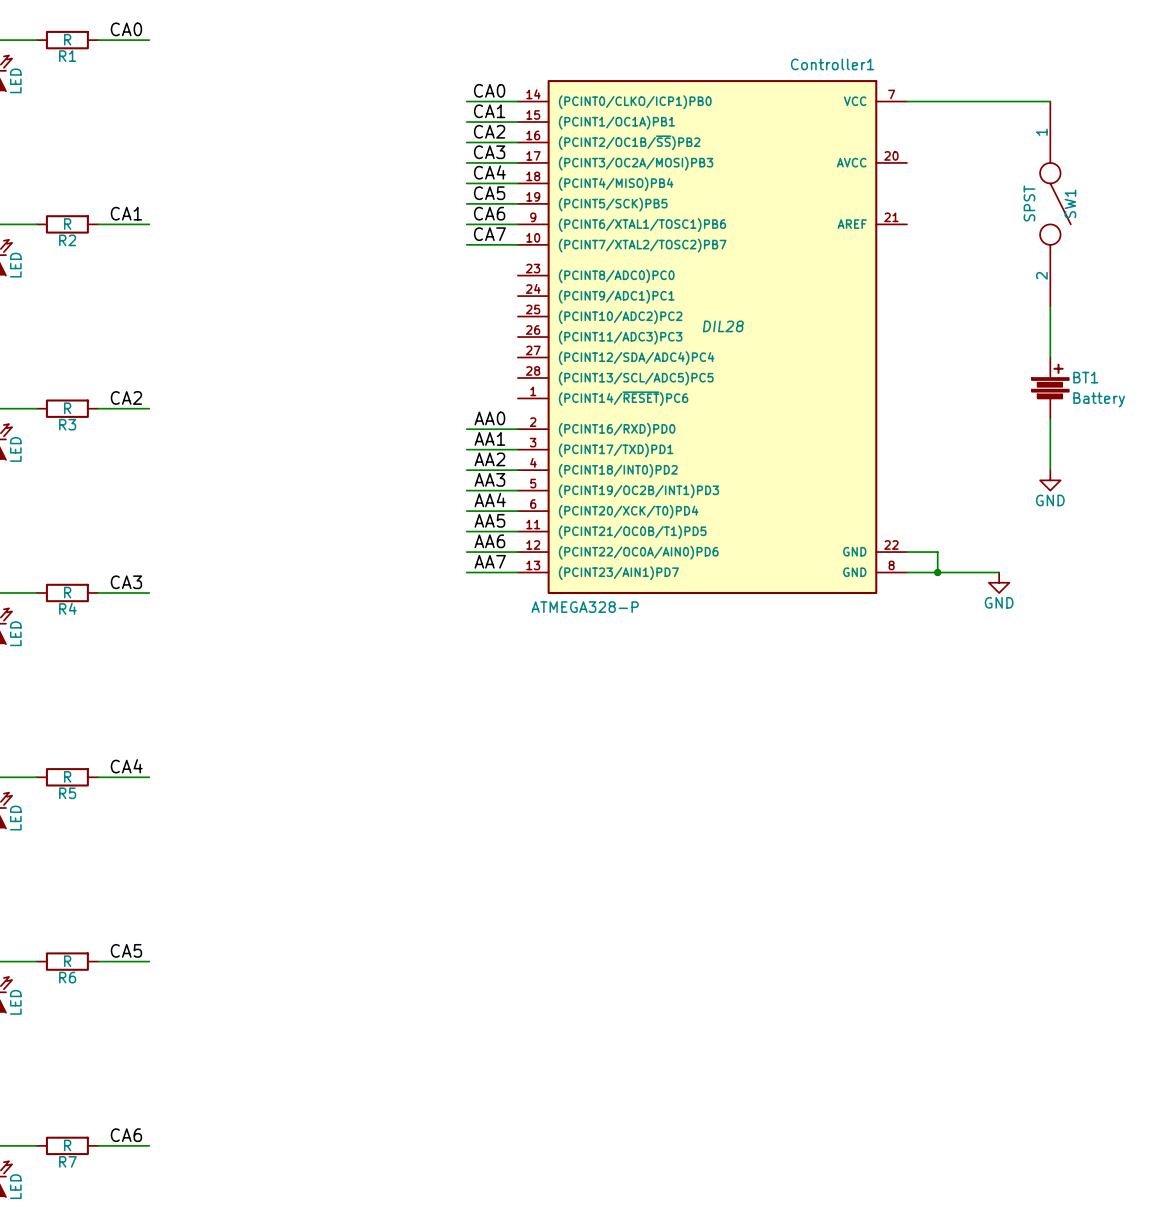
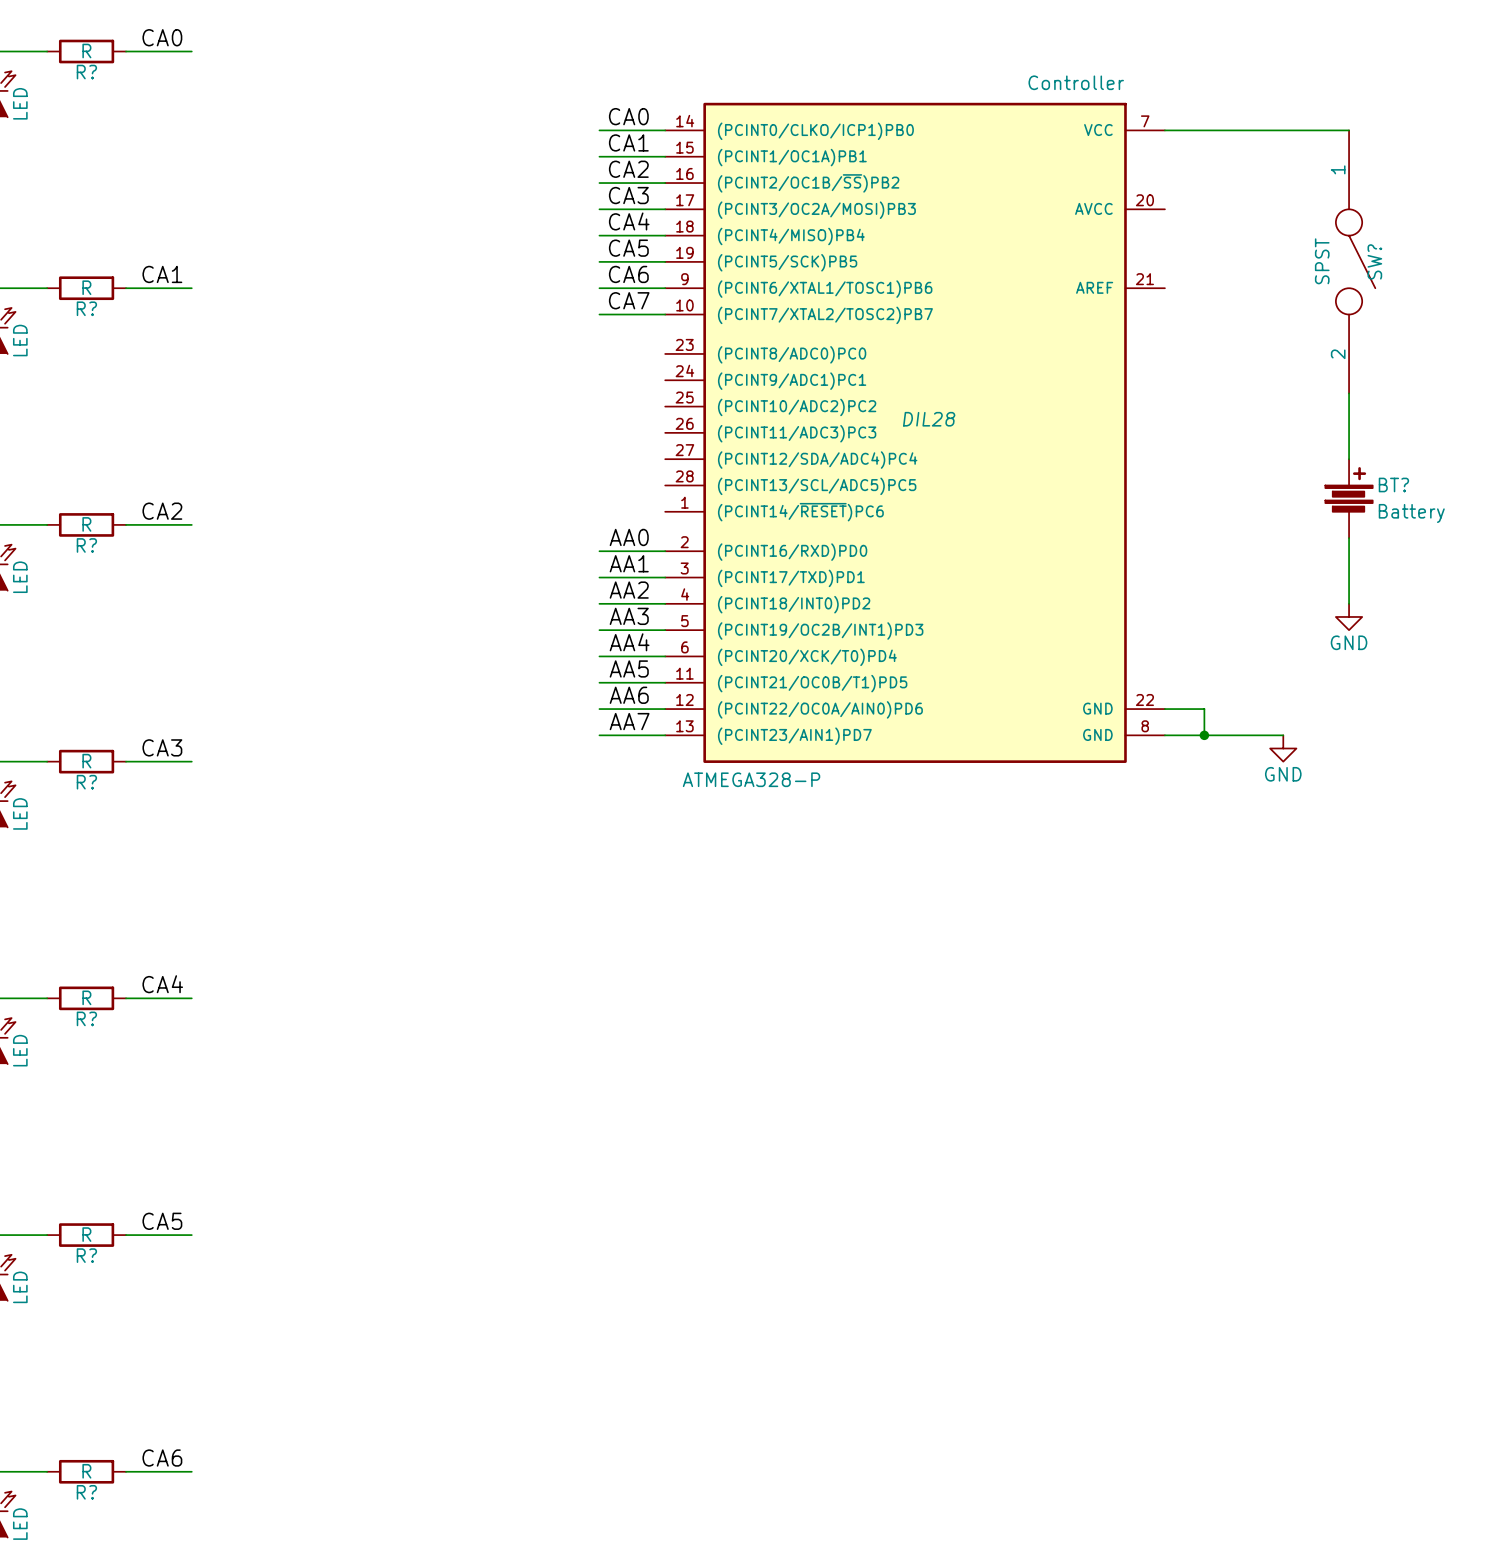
R1 name: R1 (67, 56) -> R? (86, 72)
Controller1 name: Controller1 (832, 64) -> Controller (1076, 82)
SW1 name: SW1 (1070, 203) -> SW? (1374, 261)
R2 name: R2 (67, 240) -> R? (86, 308)
BT1 name: BT1 (1085, 377) -> BT? (1393, 484)
R3 name: R3 (67, 424) -> R? (86, 545)
R4 name: R4 (67, 608) -> R? (86, 782)
R5 name: R5 (67, 793) -> R? (86, 1018)
R6 name: R6 (67, 977) -> R? (86, 1255)
R7 name: R7 (67, 1161) -> R? (86, 1492)

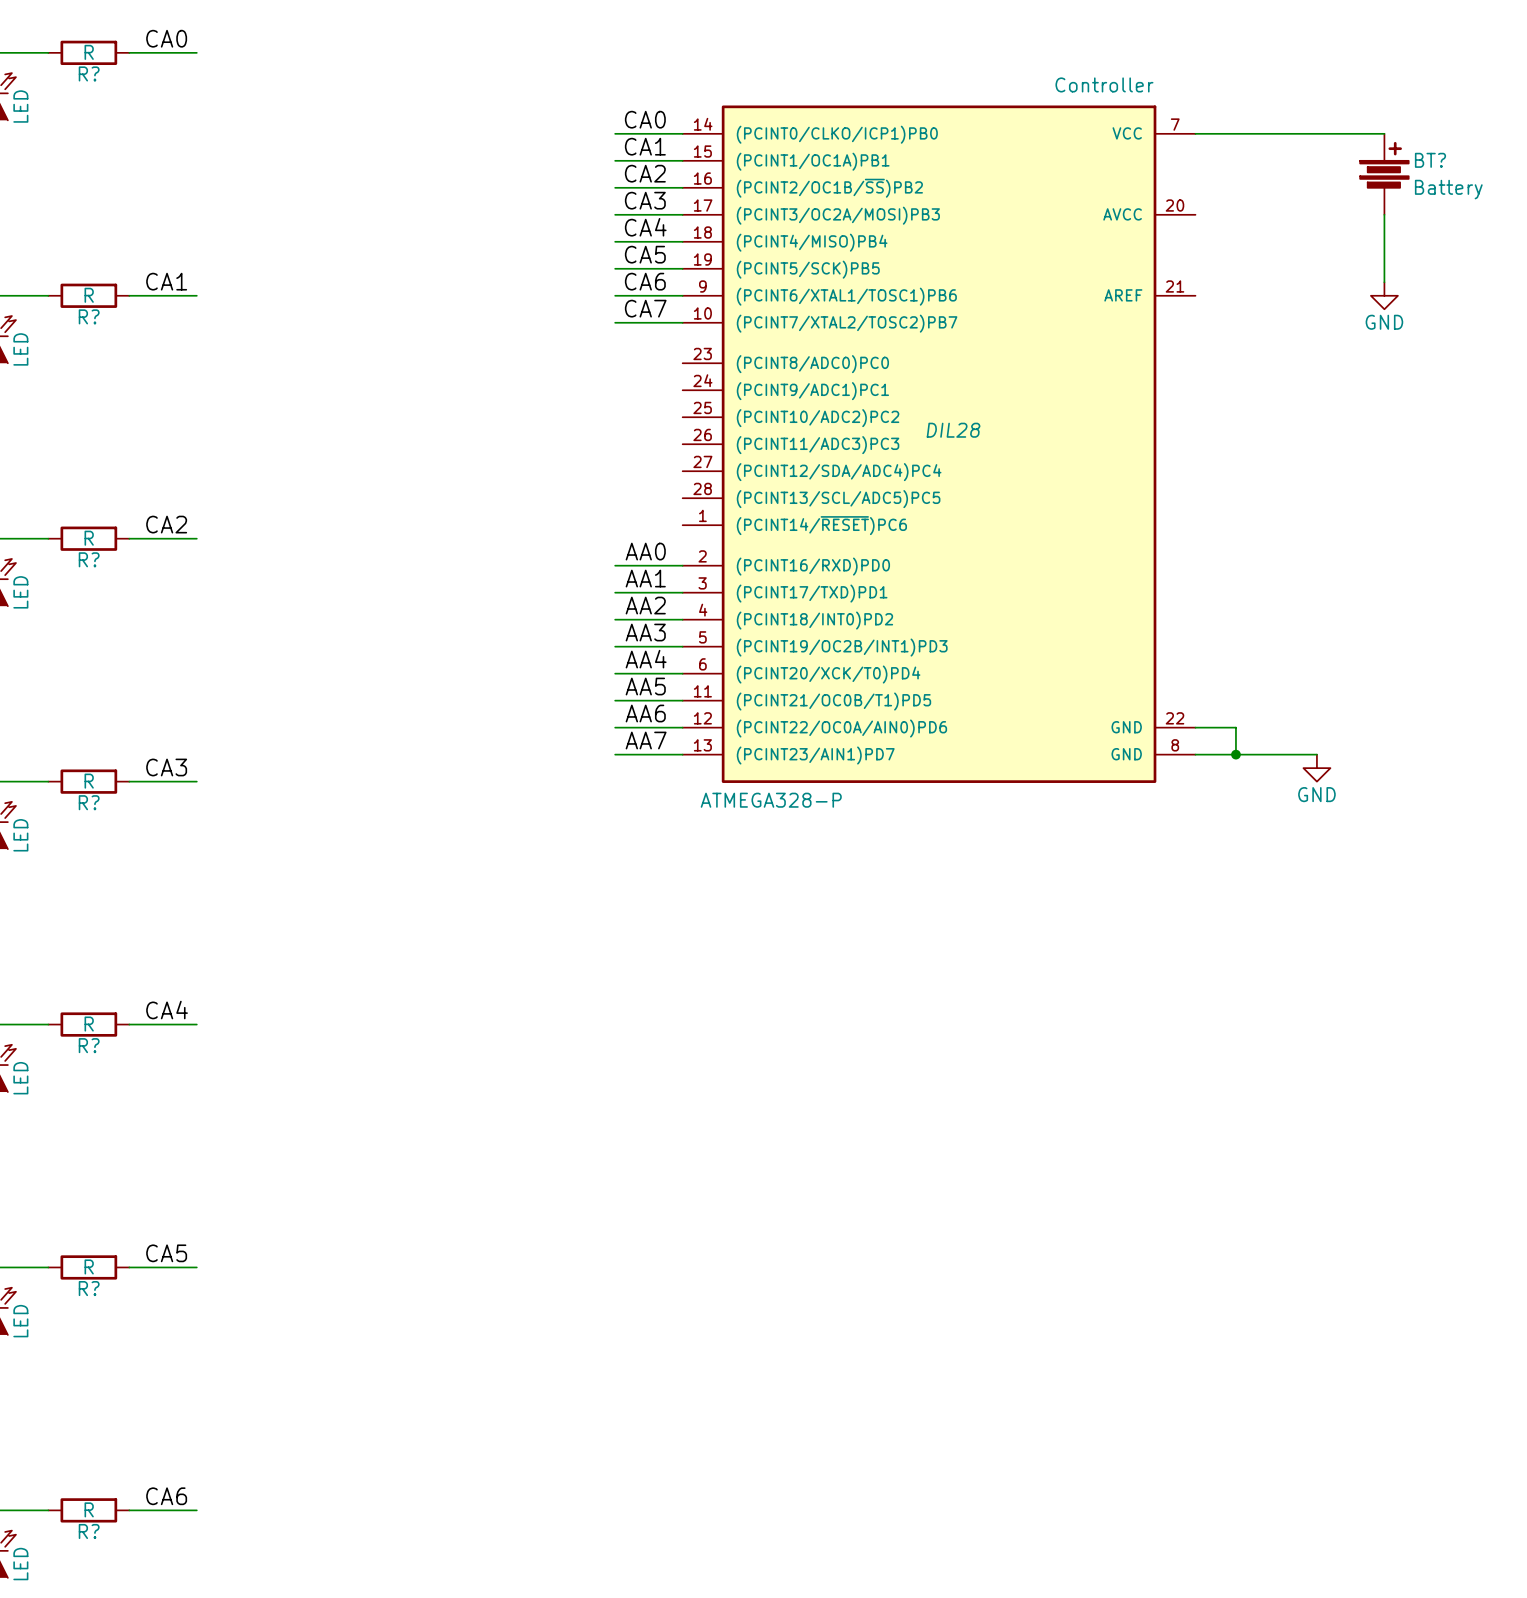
BT?: none -> Battery (1384, 174)
SW?: SPST (1355, 261) -> none
power symbol: none -> GND (1384, 295)
wire: (1349, 393) (1349, 459) -> (1384, 214) (1384, 282)
BT?: Battery (1349, 498) -> none
wire: (1349, 538) (1349, 603) -> none
power symbol: GND (1349, 616) -> none

